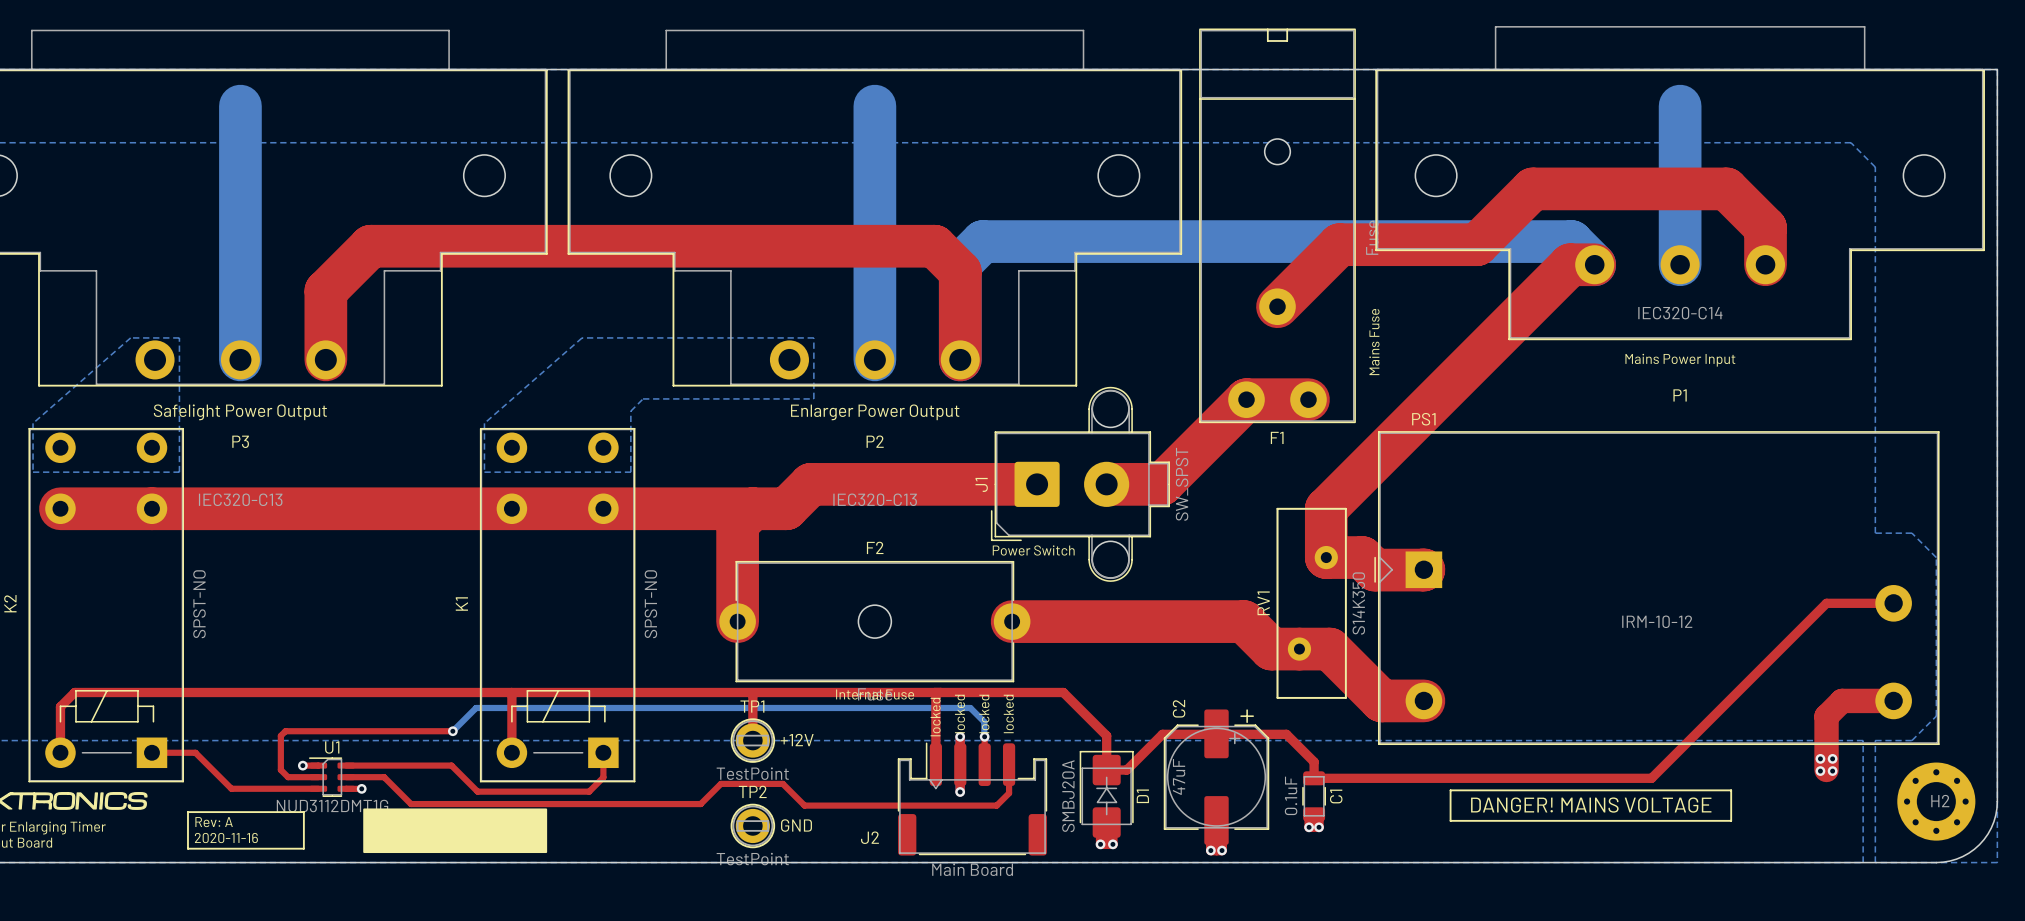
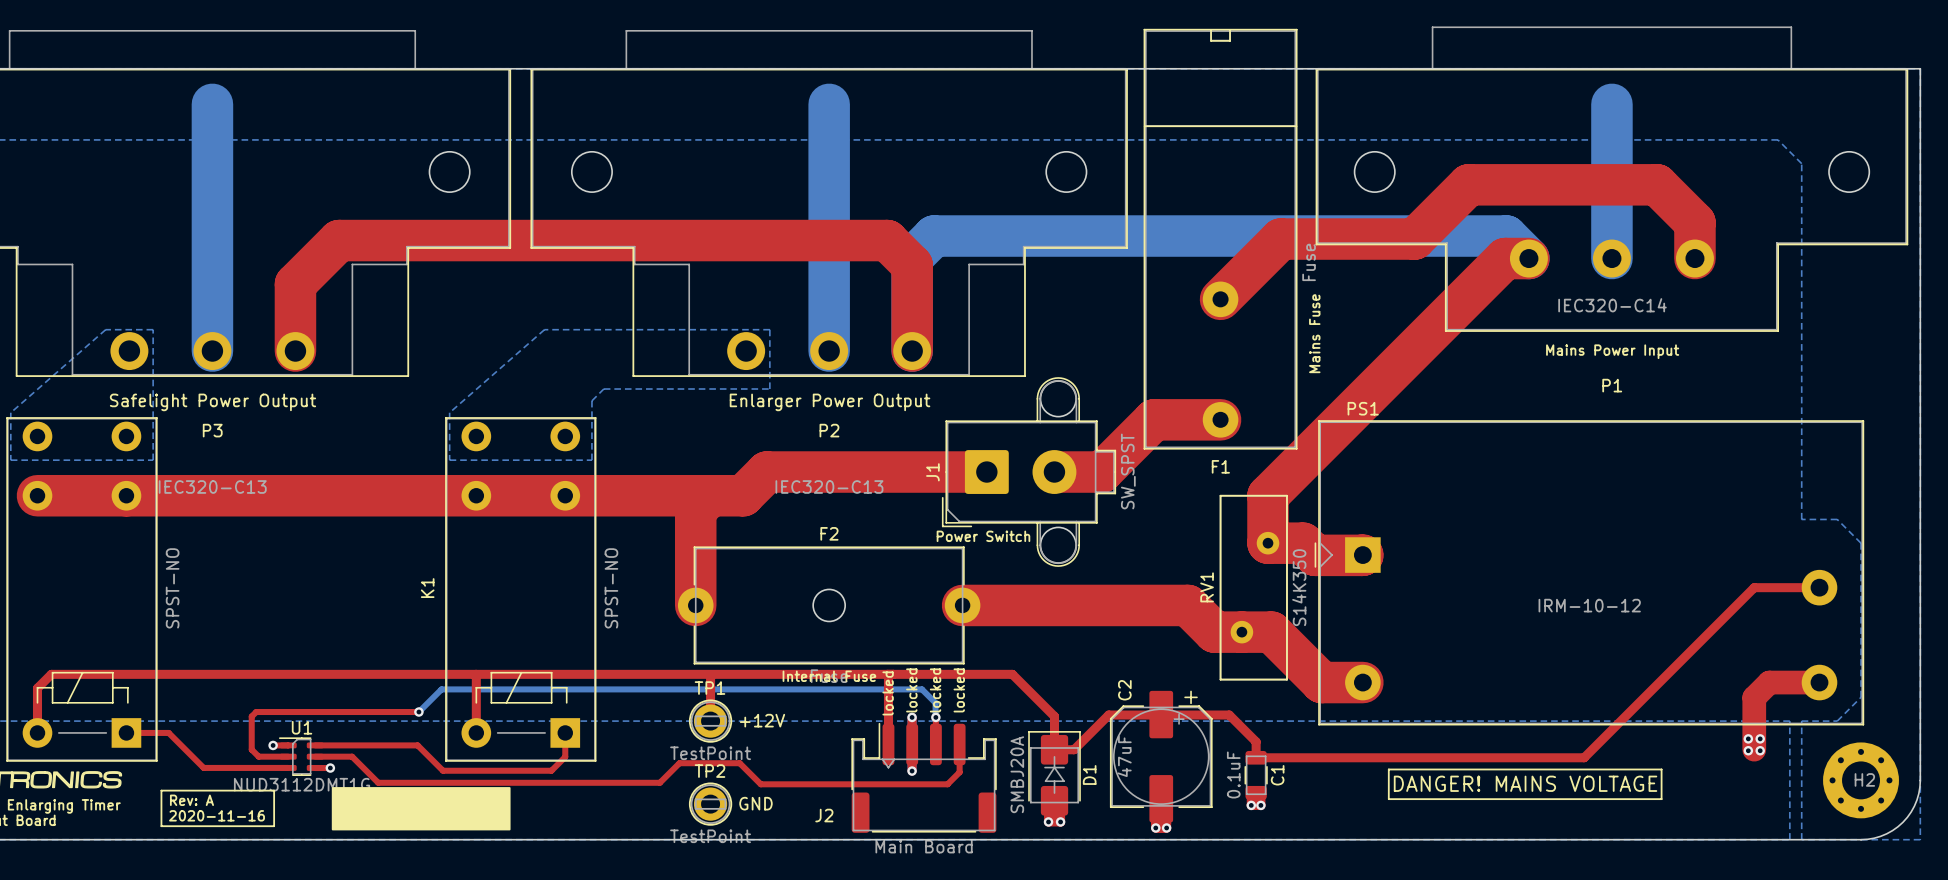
F1 footprint: [1199, 28, 1356, 424] -> [1143, 28, 1298, 450]
top track: (1308, 399) (1246, 399) (1161, 484) (1155, 484) -> (1220, 419) (1154, 419) (1101, 472)

